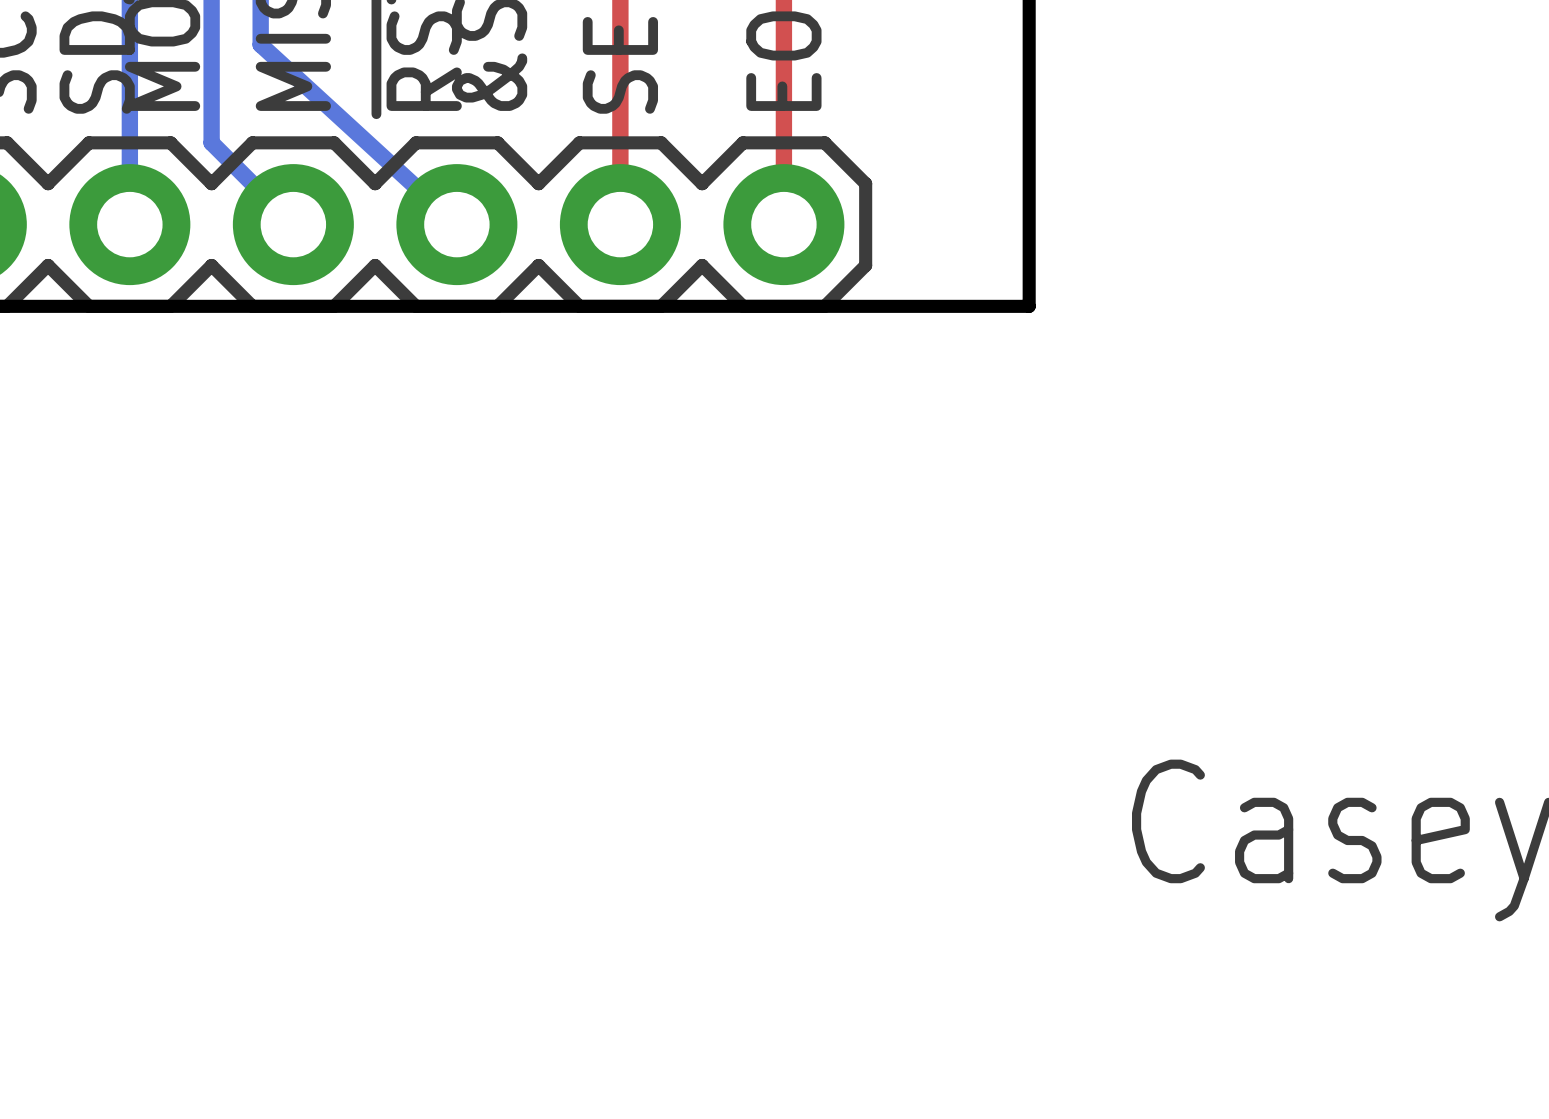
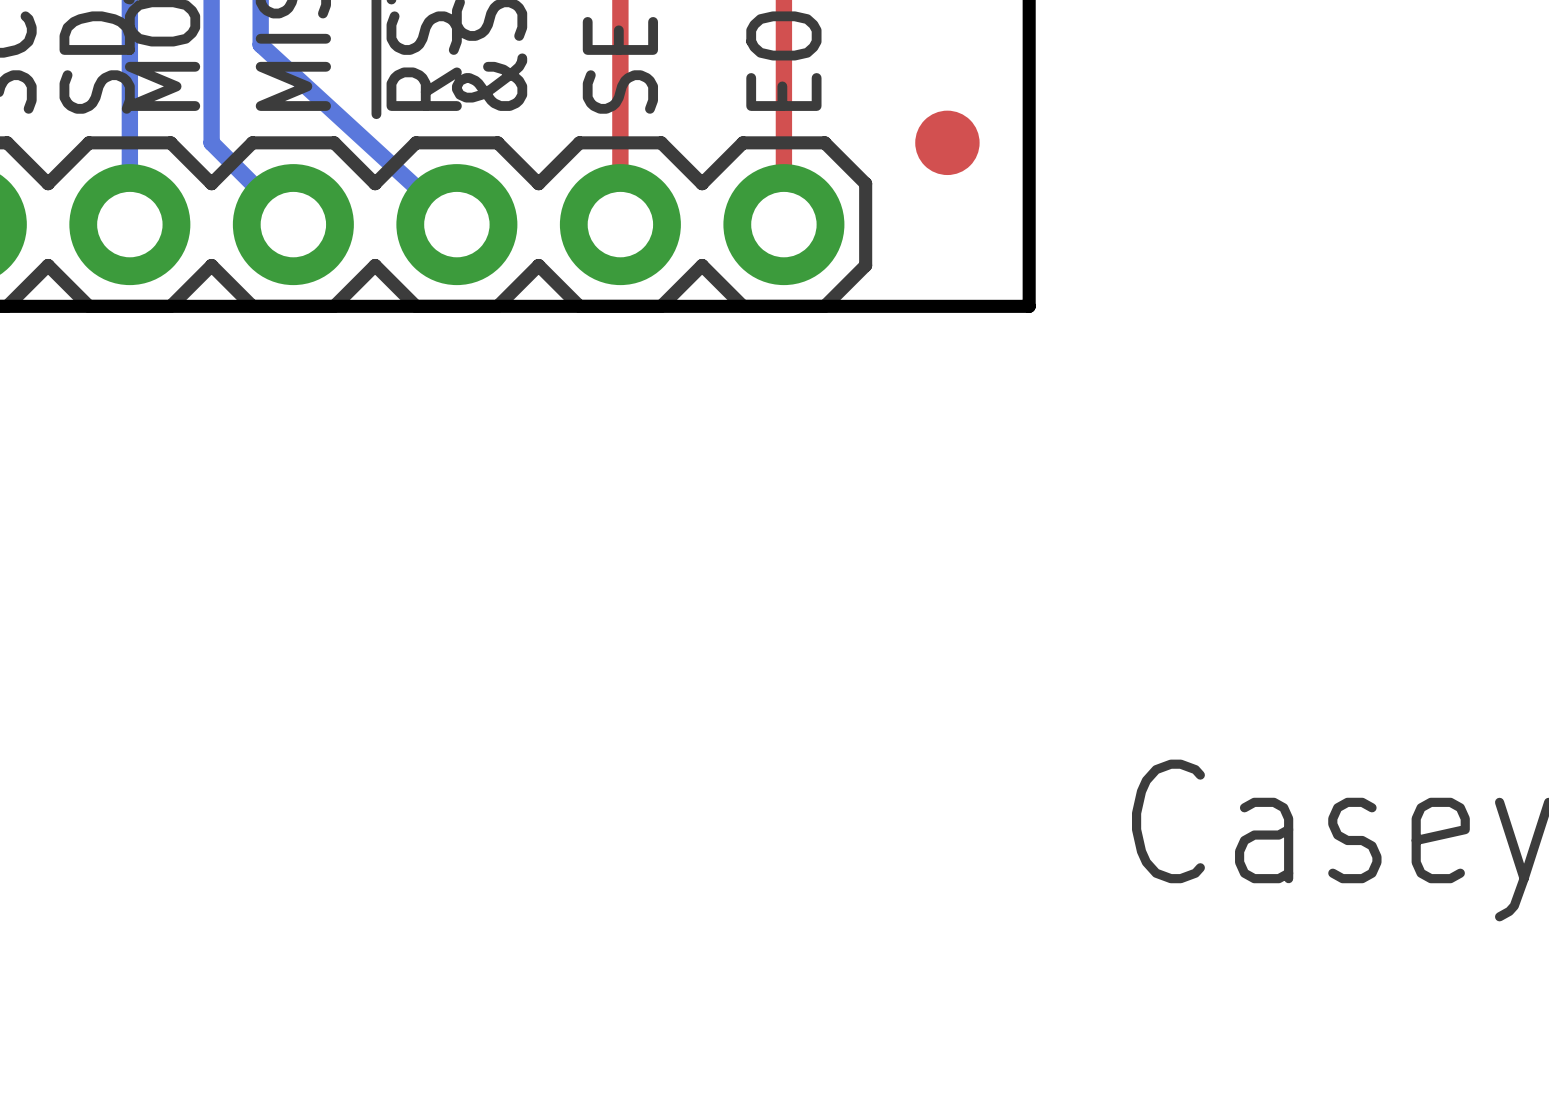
part: none -> (947, 142)

